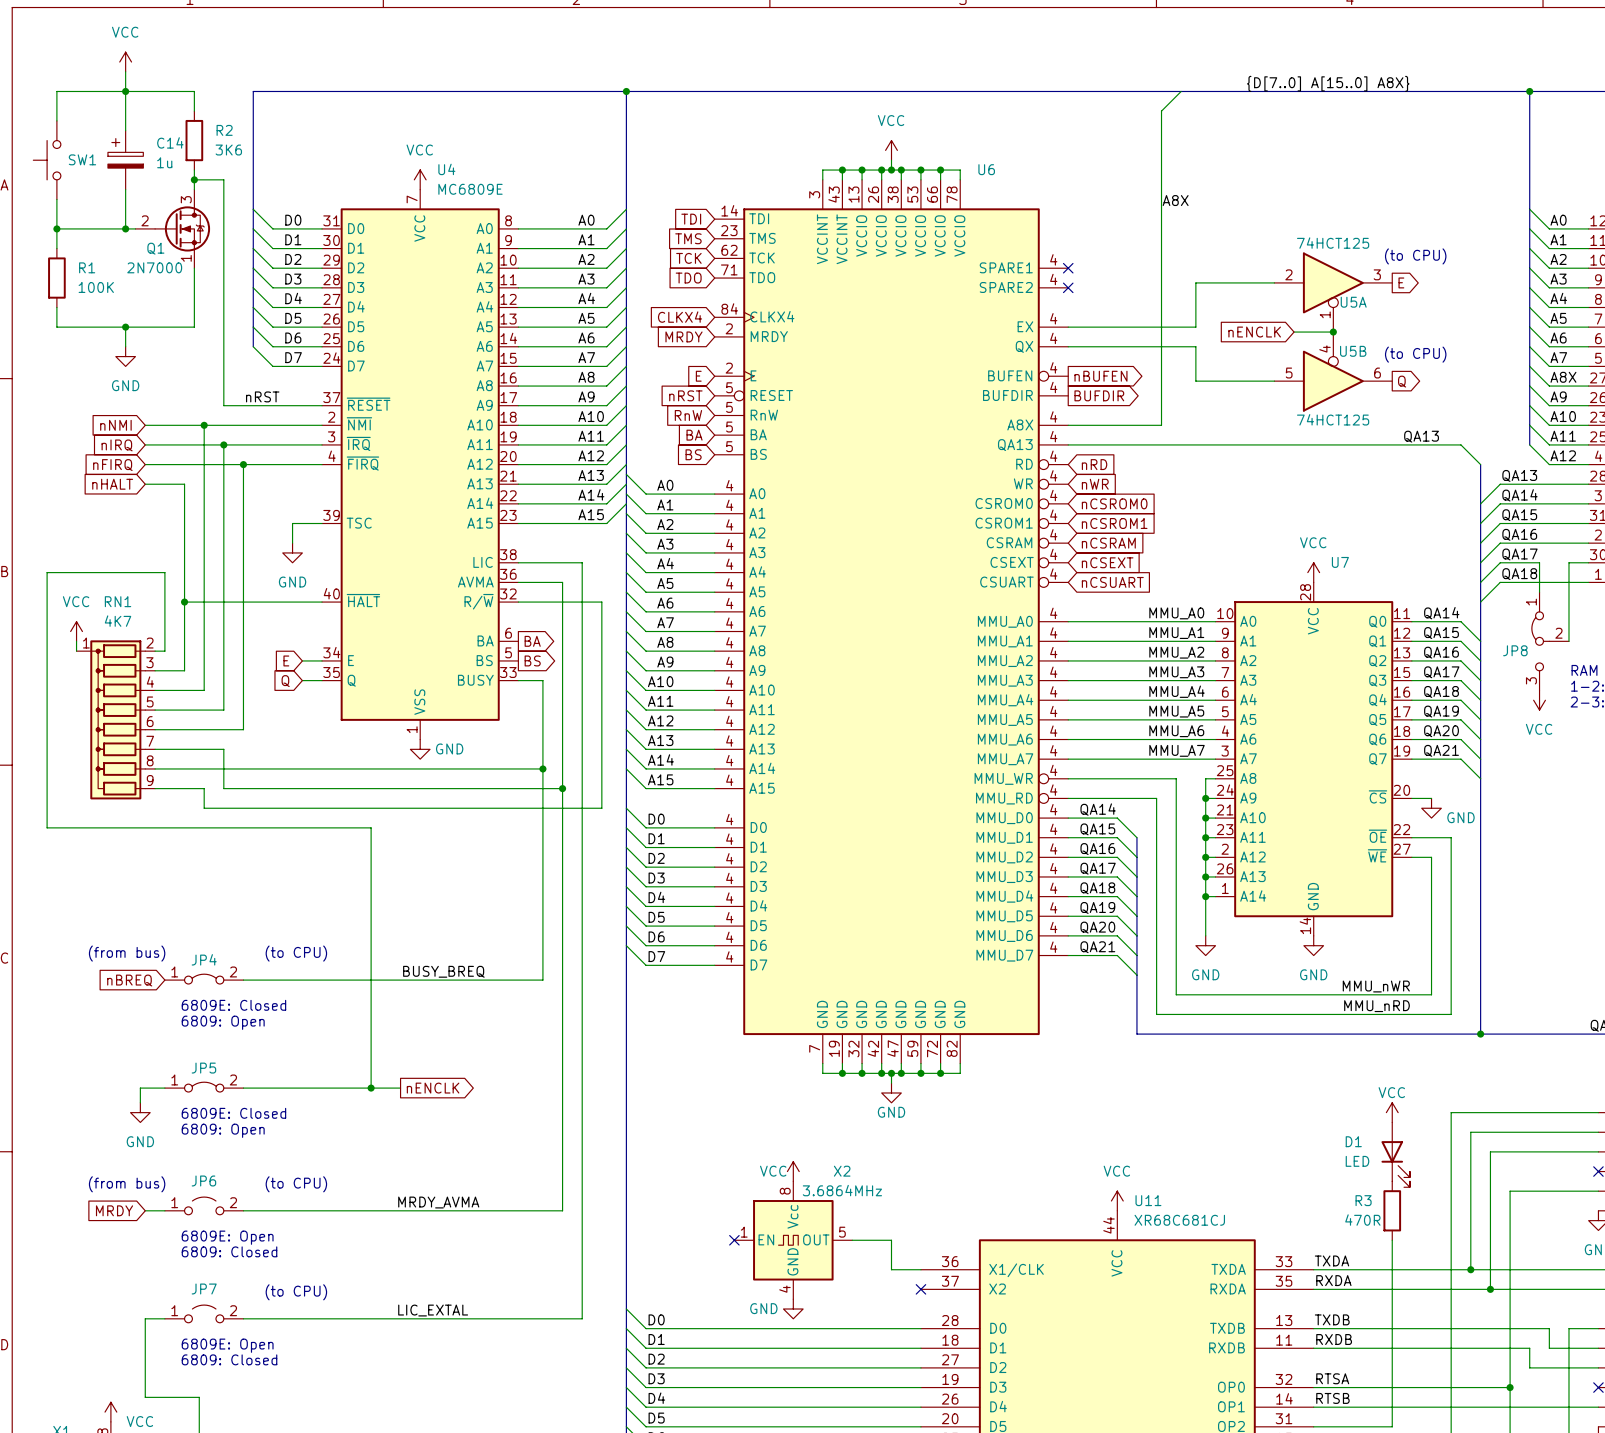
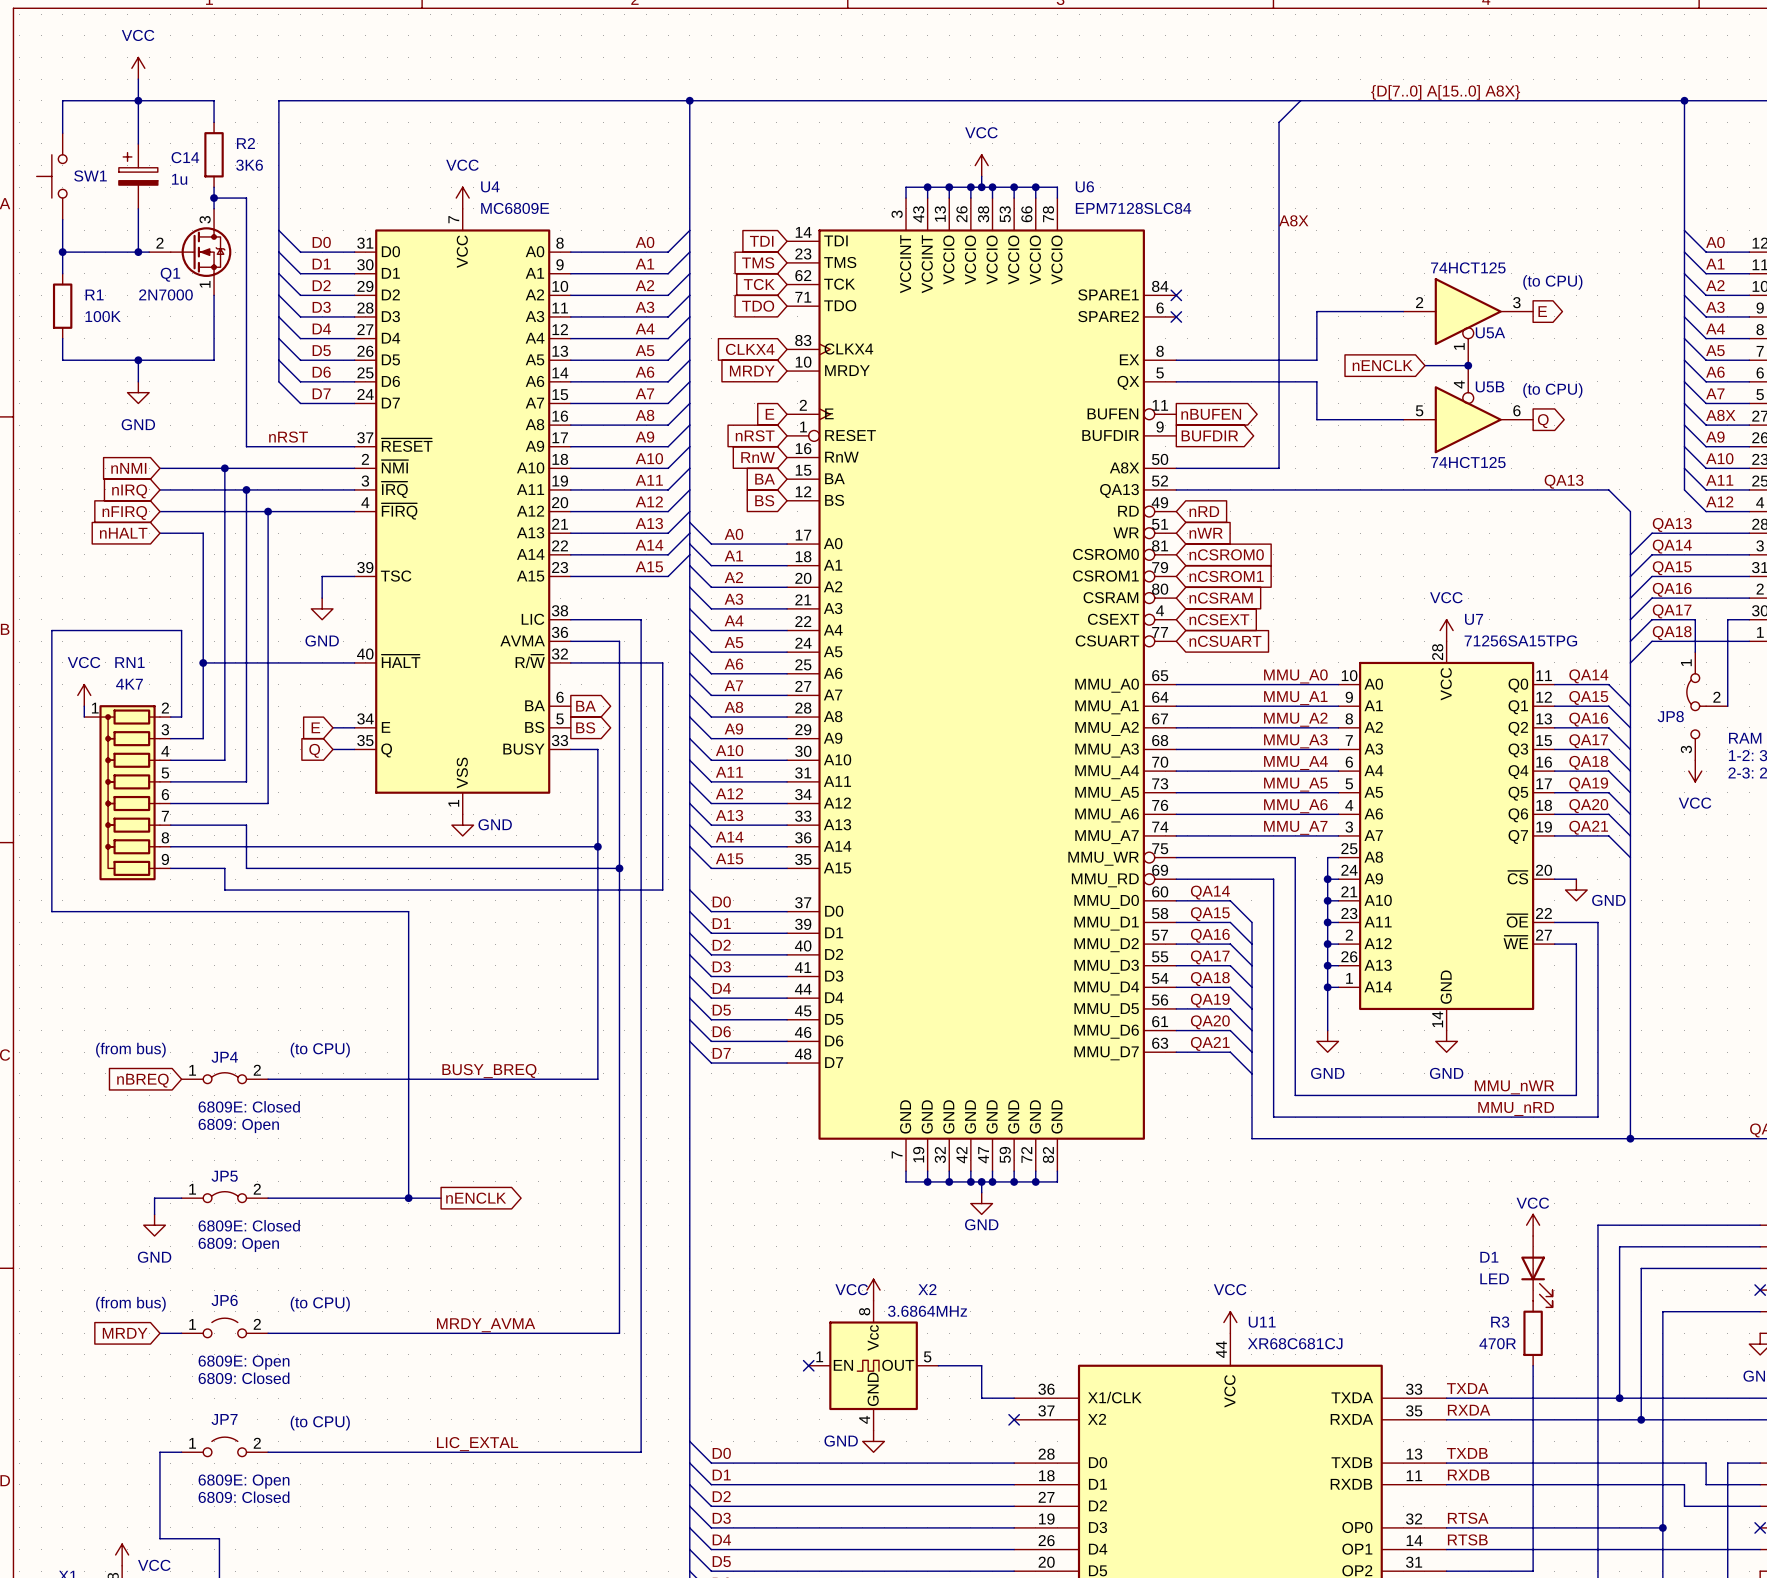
U6 symbol: [714, 179, 1069, 1064] -> [787, 198, 1177, 1172]
U6 value: none -> EPM7128SLC84 (1133, 208)
U7 value: none -> 71256SA15TPG (1520, 640)

